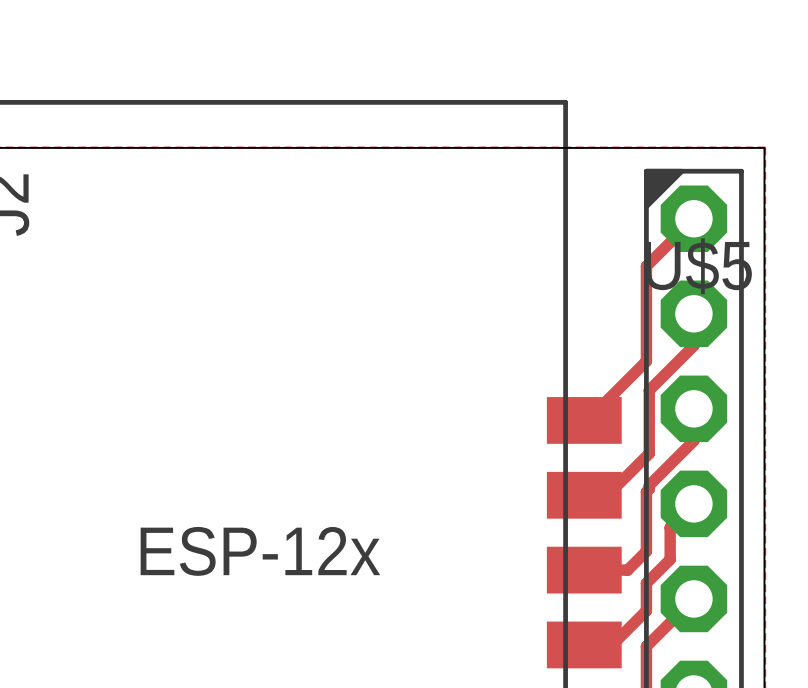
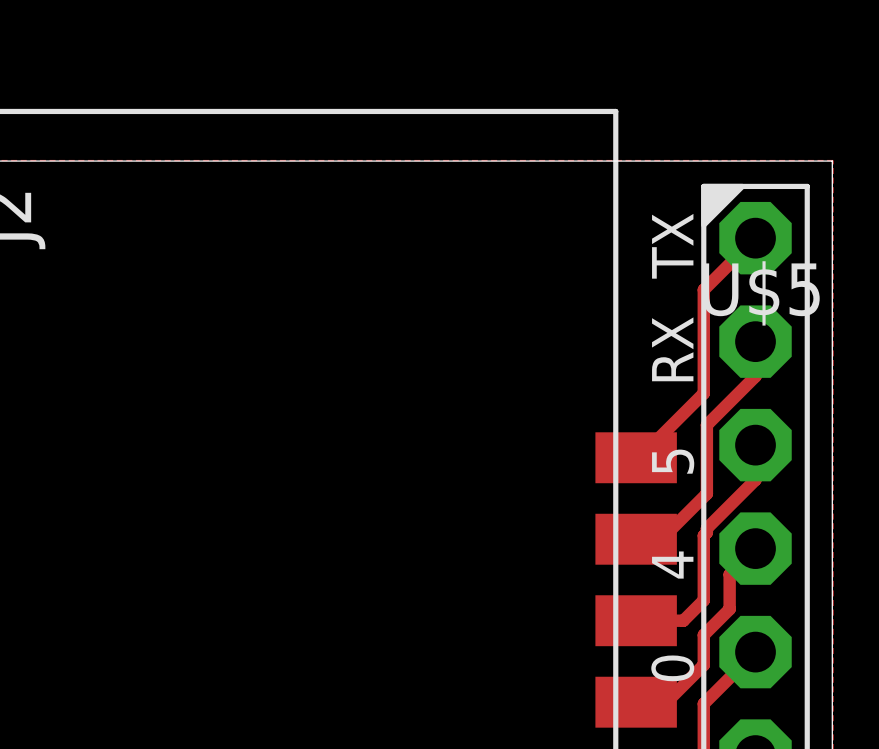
text: none -> TX (672, 246)
text: none -> RX (672, 349)
text: none -> 5 (673, 461)
text: none -> 4 (672, 565)
text: ESP-12x (260, 551) -> none
text: none -> 0 (672, 668)

